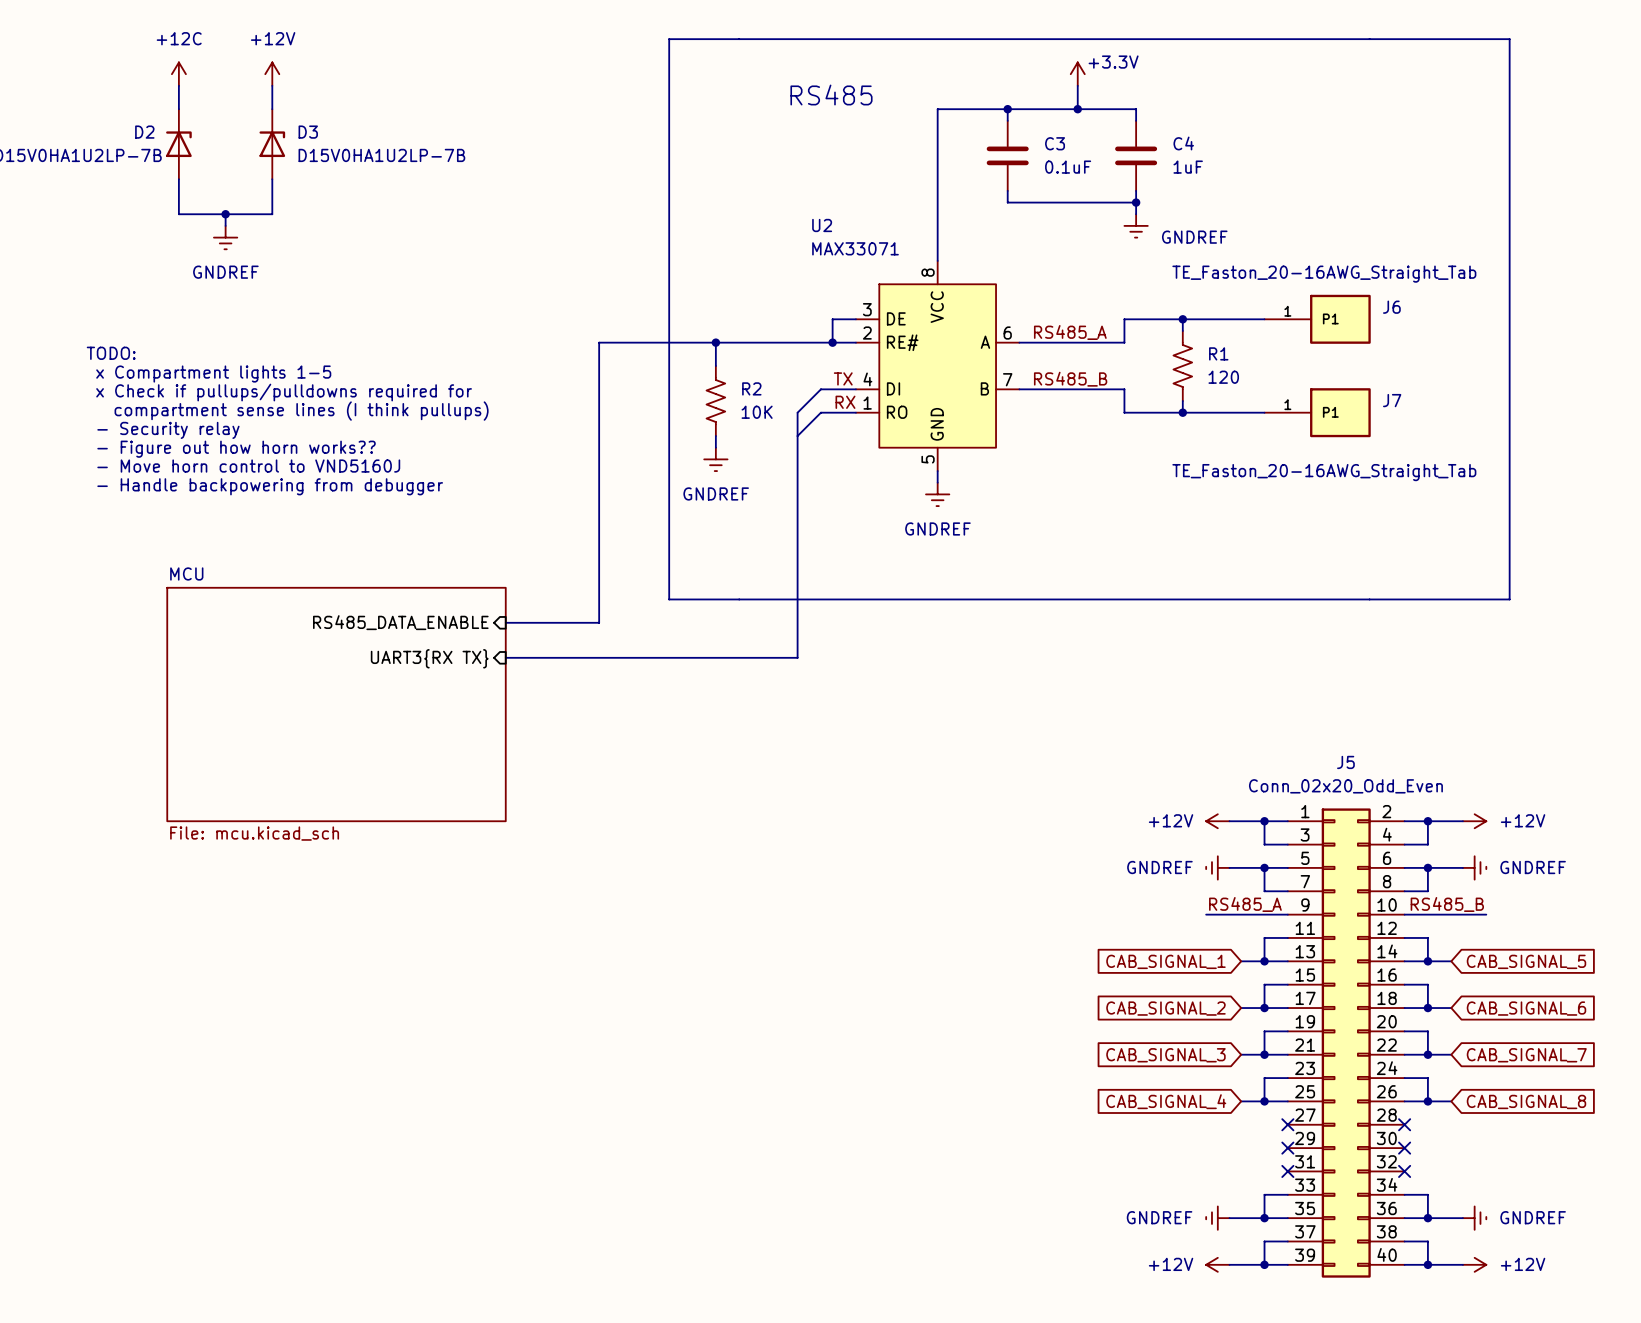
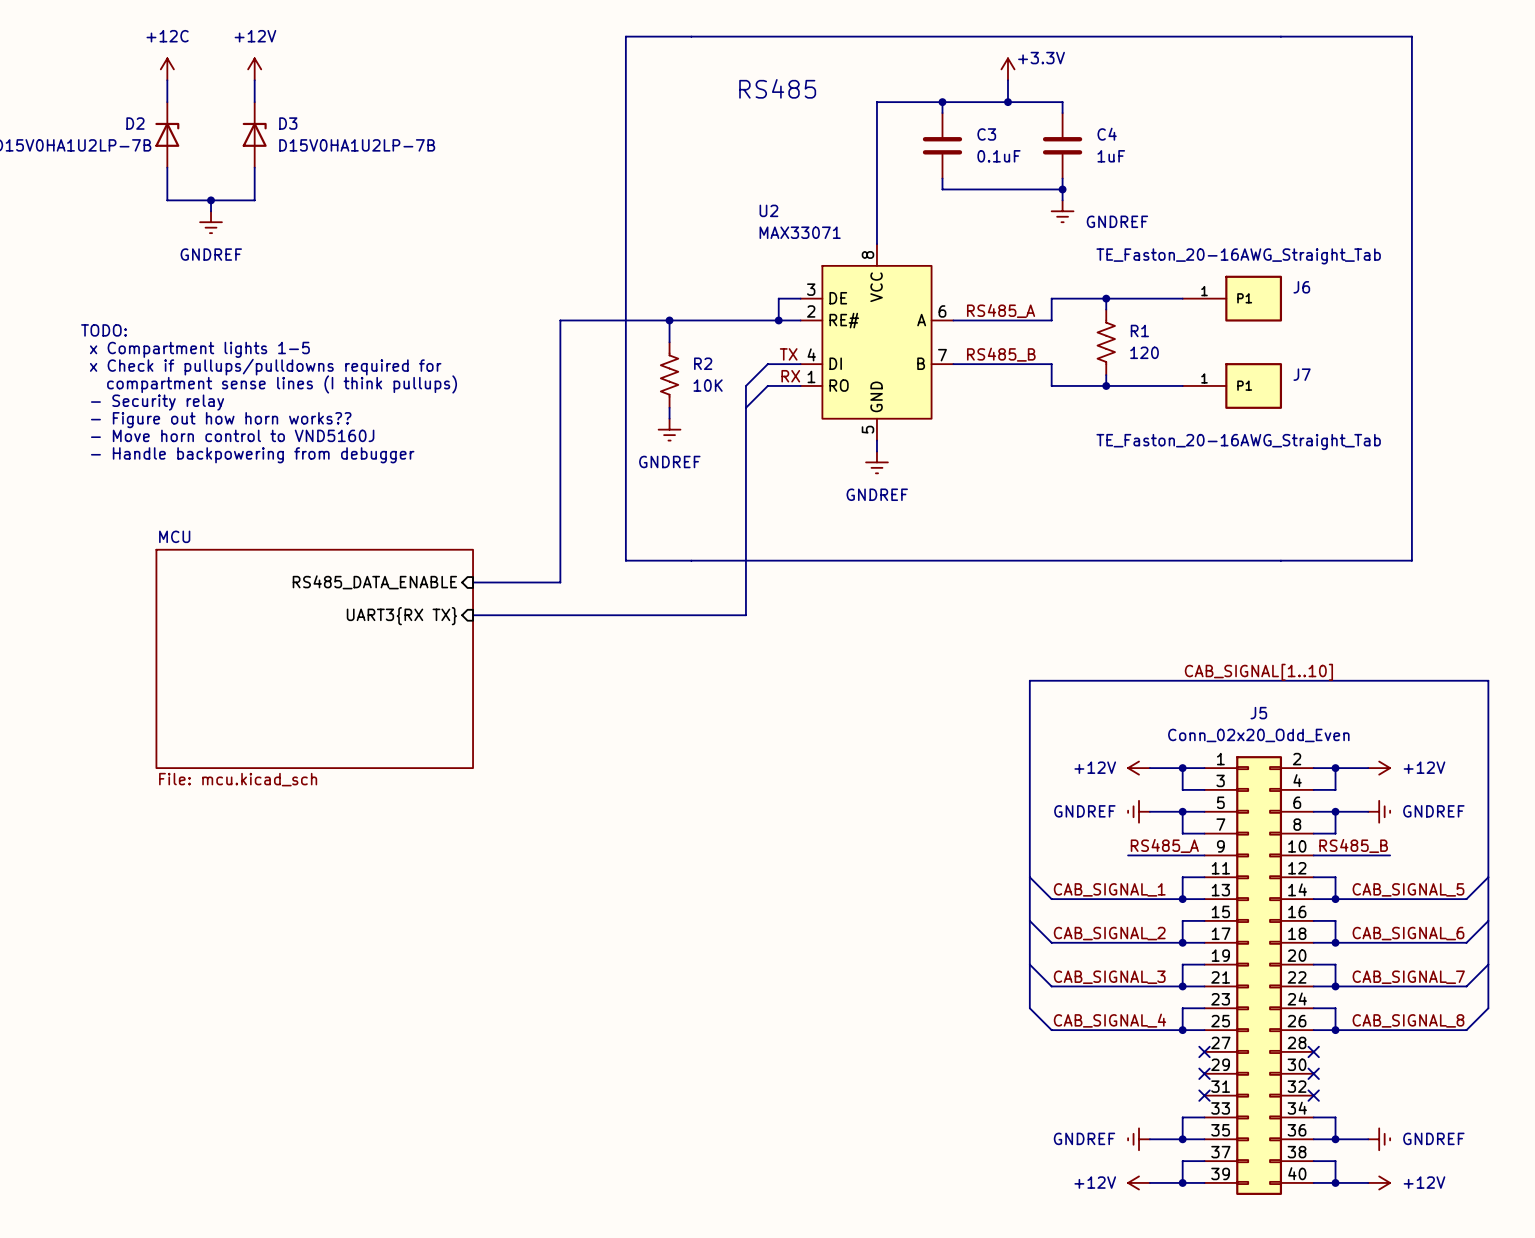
label: none -> CAB_SIGNAL[1..10] (1258, 672)
wire: none -> (1029, 877) (1051, 899) (1160, 899)
wire: none -> (1488, 877) (1466, 899) (1357, 899)
label: none -> CAB_SIGNAL_1 (1109, 889)
label: none -> CAB_SIGNAL_5 (1408, 889)
global label: CAB_SIGNAL_1 (1165, 961) -> none
global label: CAB_SIGNAL_5 (1526, 961) -> none
wire: none -> (1029, 920) (1051, 942) (1160, 942)
wire: none -> (1488, 920) (1466, 942) (1357, 942)
label: none -> CAB_SIGNAL_2 (1109, 933)
label: none -> CAB_SIGNAL_6 (1408, 933)
global label: CAB_SIGNAL_2 (1165, 1008) -> none
global label: CAB_SIGNAL_6 (1526, 1008) -> none
wire: none -> (1029, 964) (1051, 986) (1160, 986)
wire: none -> (1488, 964) (1466, 986) (1357, 986)
label: none -> CAB_SIGNAL_3 (1109, 977)
label: none -> CAB_SIGNAL_7 (1408, 977)
global label: CAB_SIGNAL_3 (1165, 1055) -> none
global label: CAB_SIGNAL_7 (1526, 1055) -> none
wire: none -> (1029, 1008) (1051, 1030) (1160, 1030)
bus: none -> (1029, 1008) (1029, 680) (1488, 680) (1488, 1008)
wire: none -> (1488, 1008) (1466, 1030) (1357, 1030)
label: none -> CAB_SIGNAL_4 (1109, 1020)
label: none -> CAB_SIGNAL_8 (1408, 1020)
global label: CAB_SIGNAL_4 (1166, 1101) -> none
global label: CAB_SIGNAL_8 (1526, 1101) -> none

